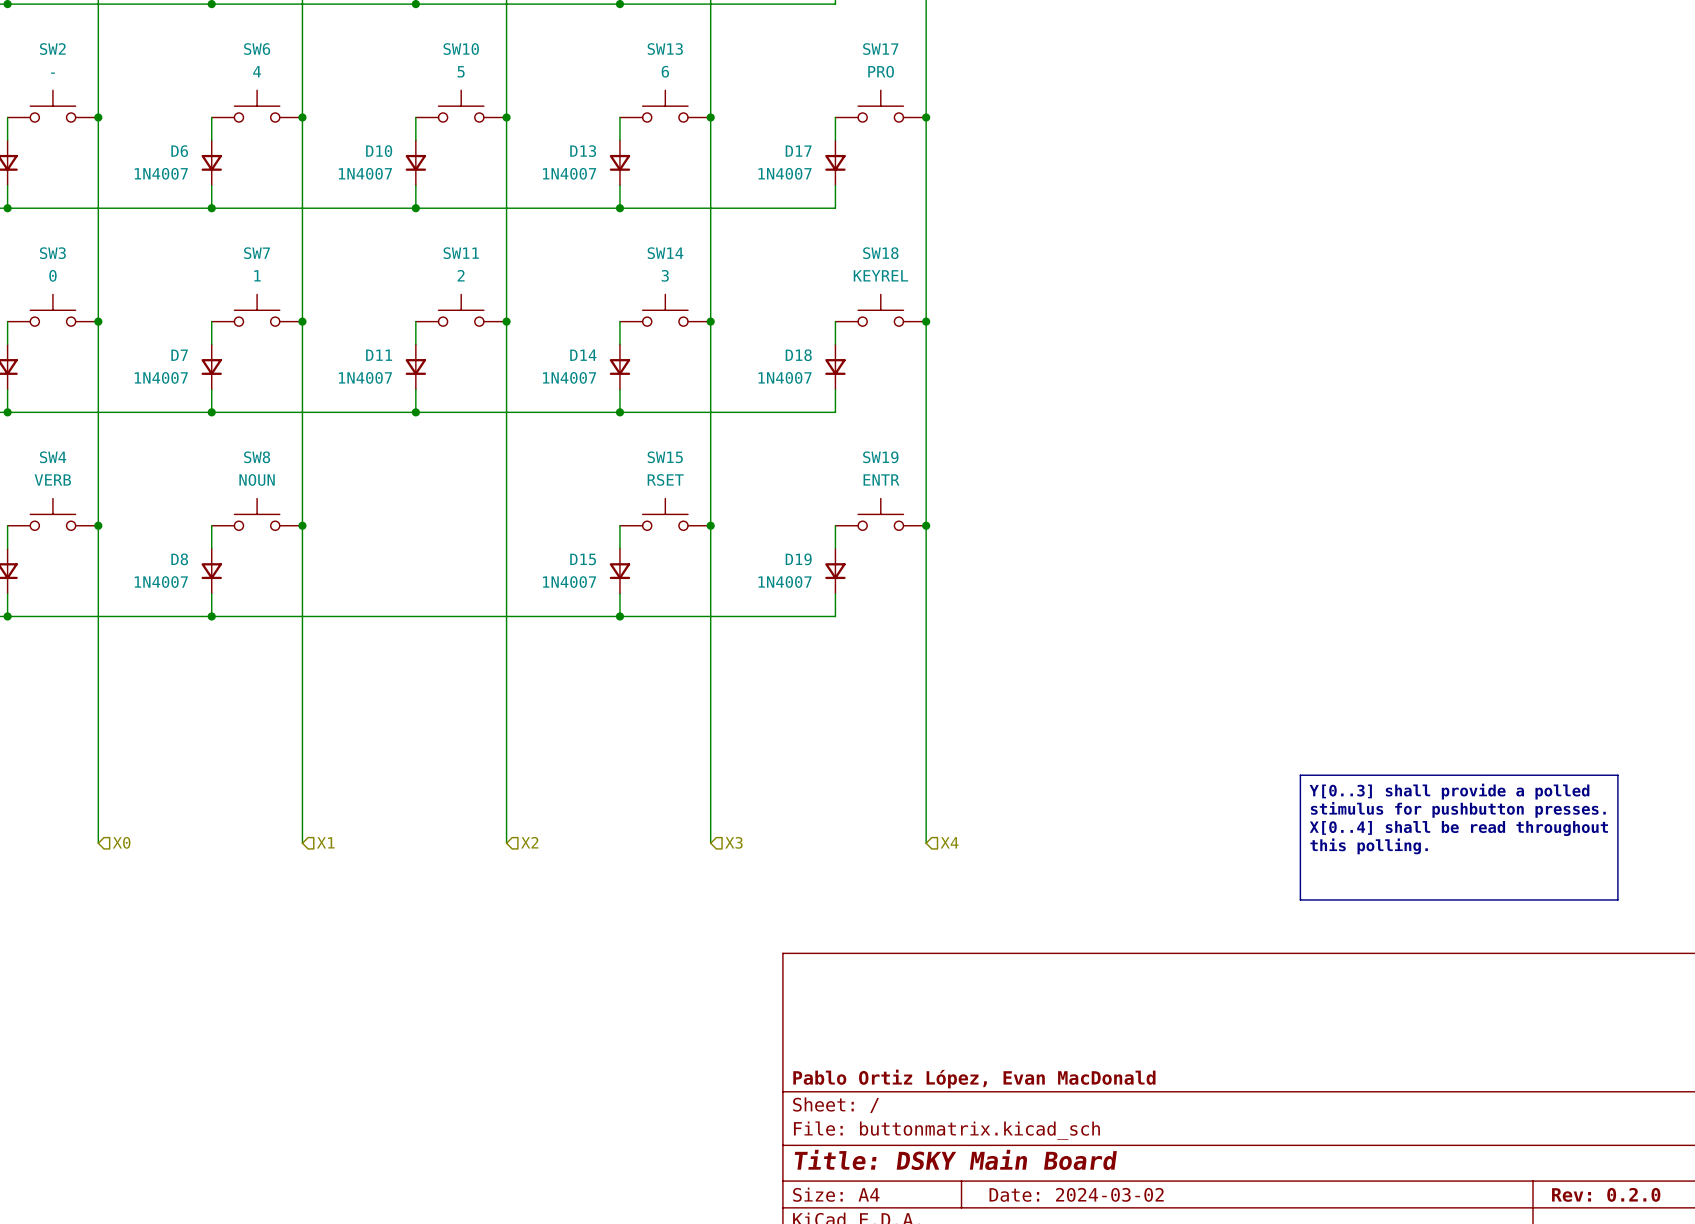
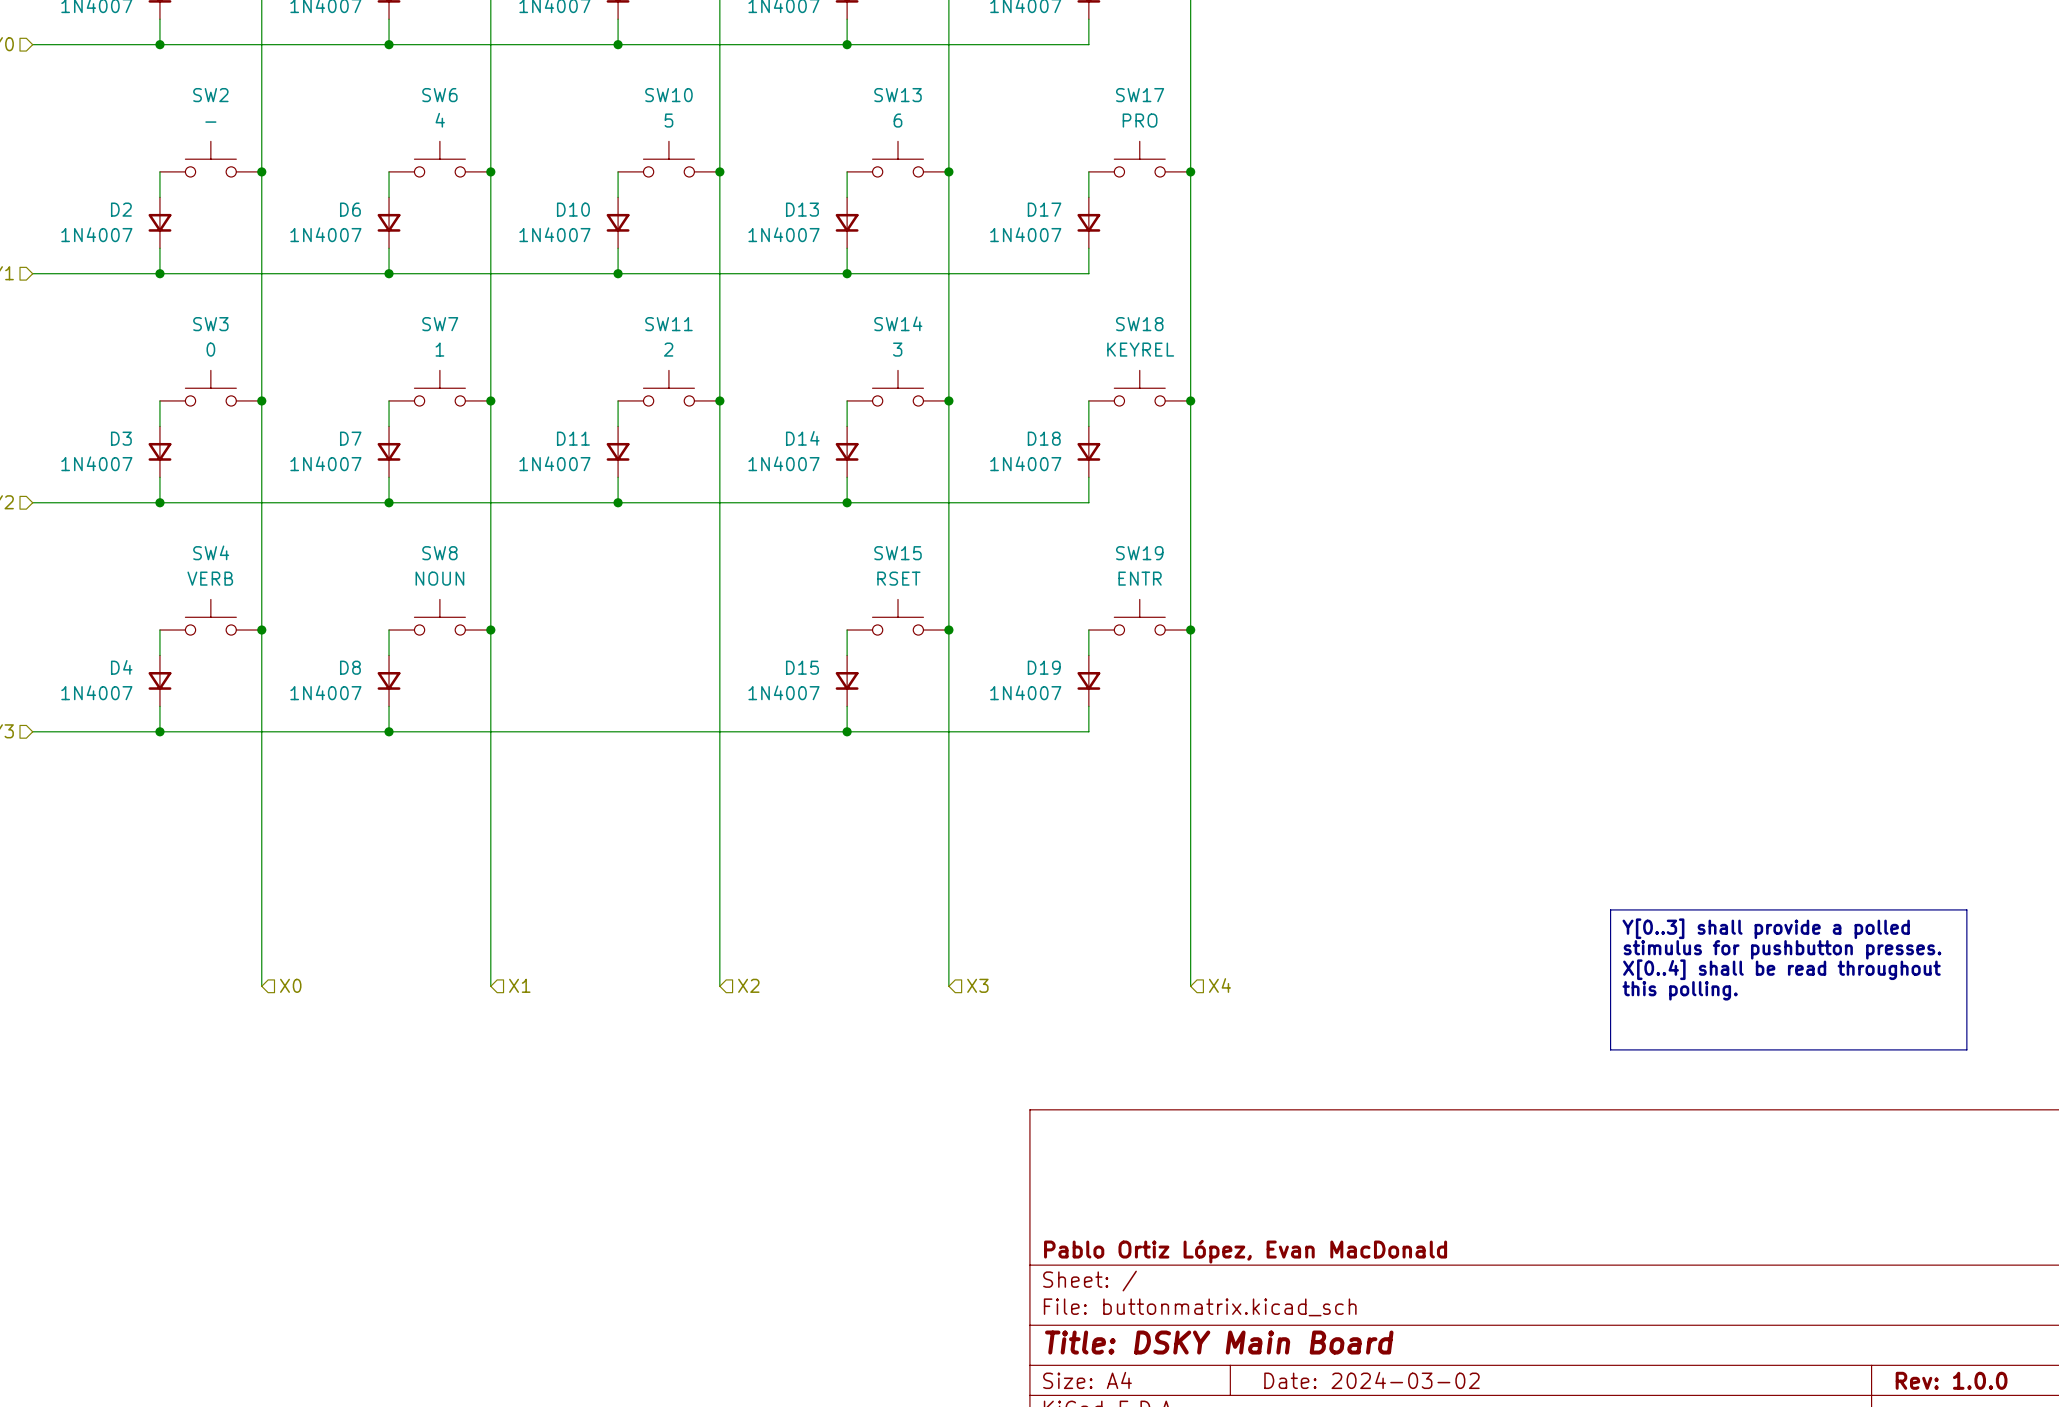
title block: Rev: 0.2.0 (1606, 1194) -> Rev: 1.0.0 (1951, 1380)

